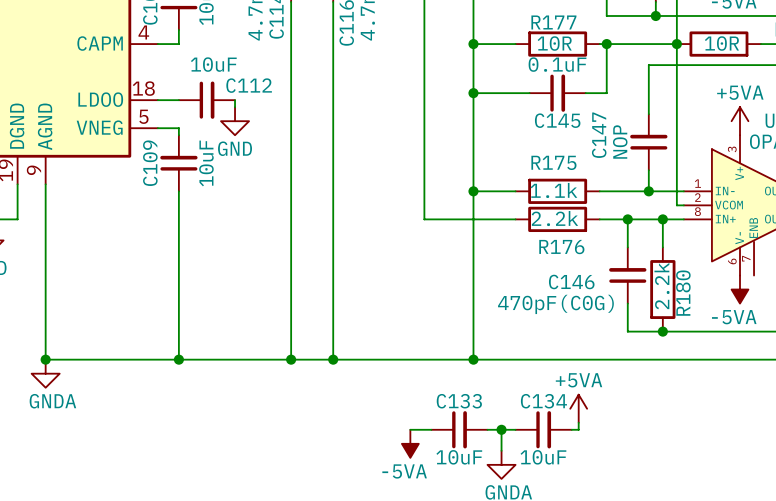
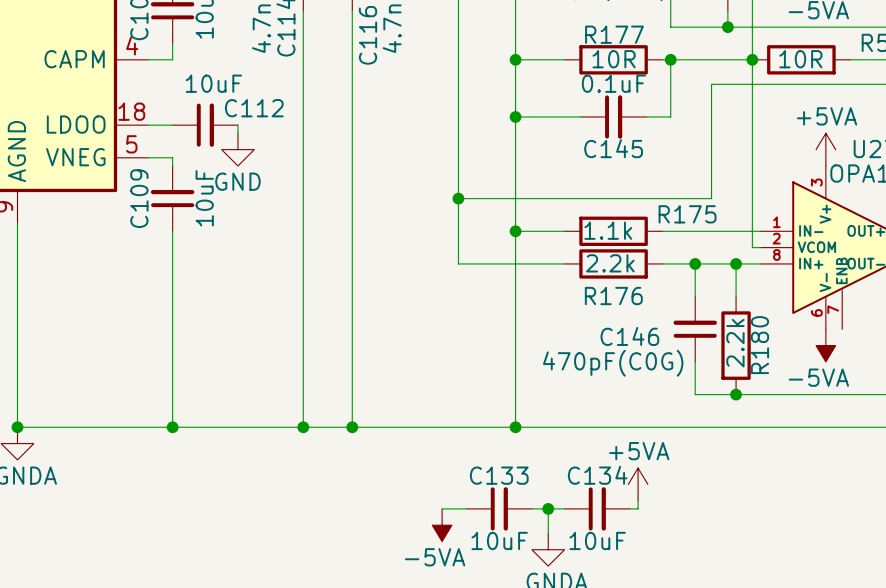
wire: (648, 65) (648, 114) -> (719, 84) (711, 84) (711, 198) (458, 198)
C147: NOP (648, 142) -> none
R175 name position: R175 (553, 162) -> R175 (687, 214)
junction: none -> (458, 198)
wire: (648, 170) (648, 191) -> none
junction: (648, 191) -> none

